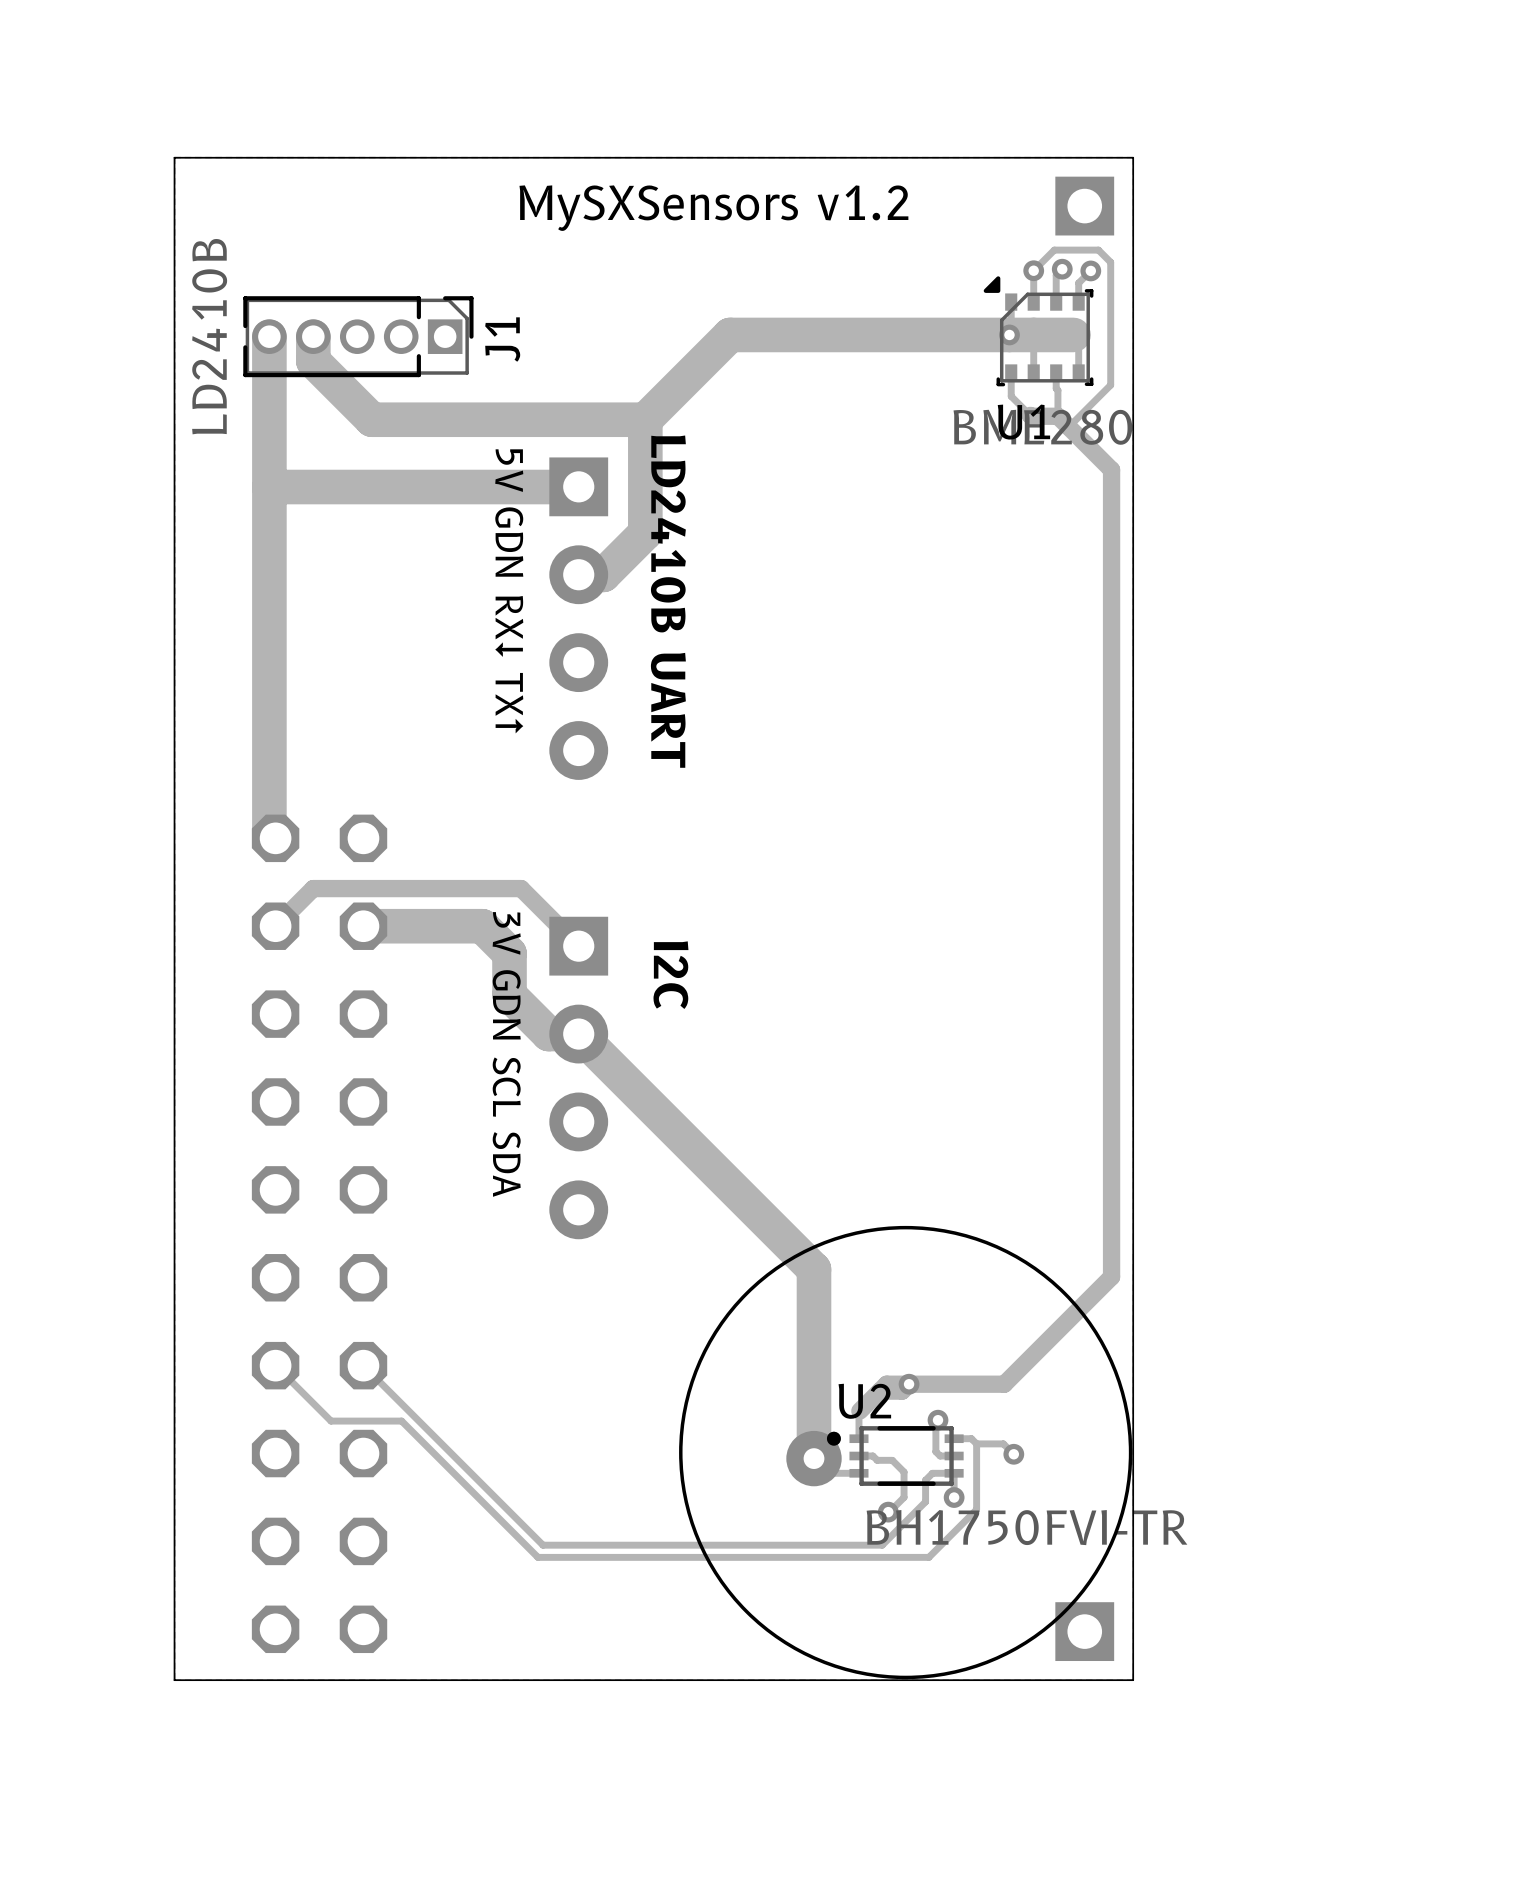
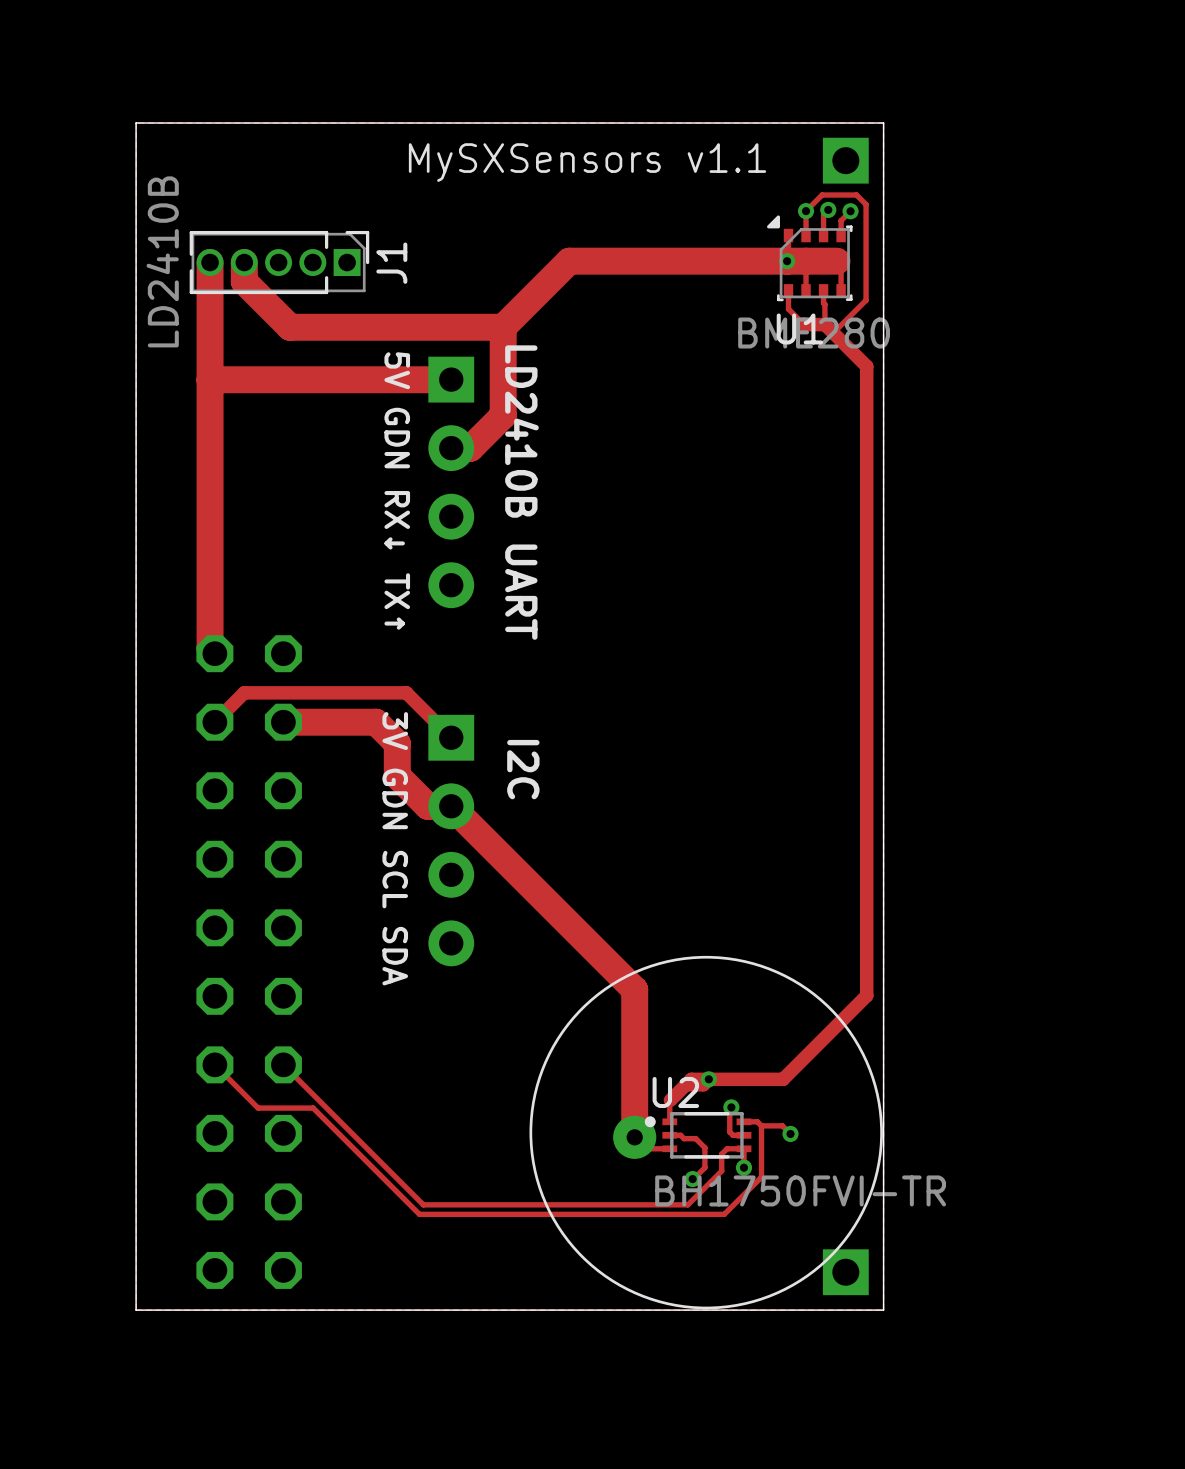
text: MySXSensors v1.2 (713, 208) -> MySXSensors v1.1 (587, 162)

